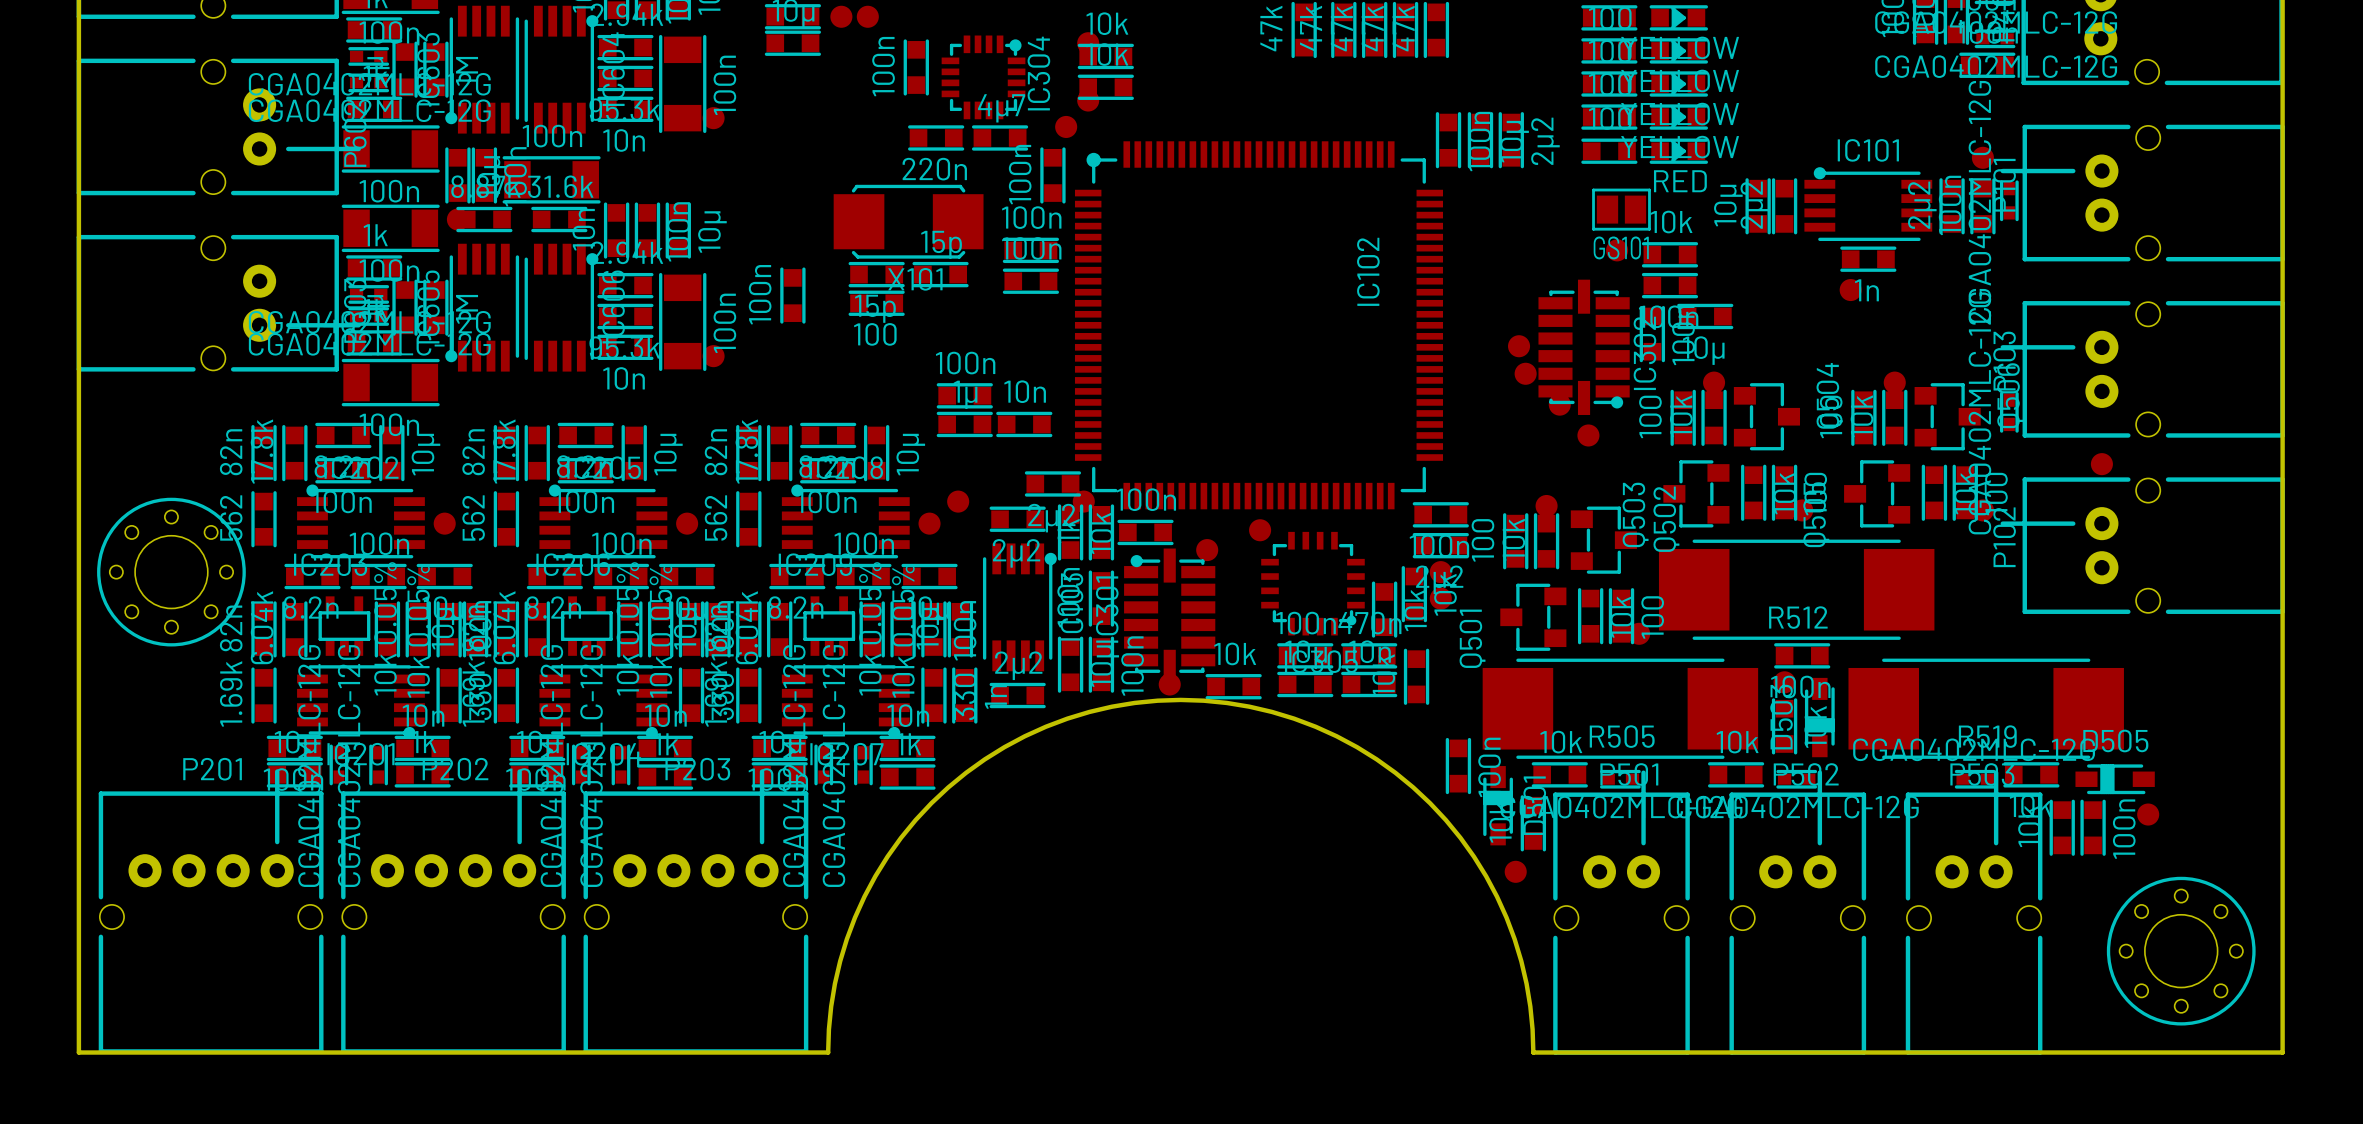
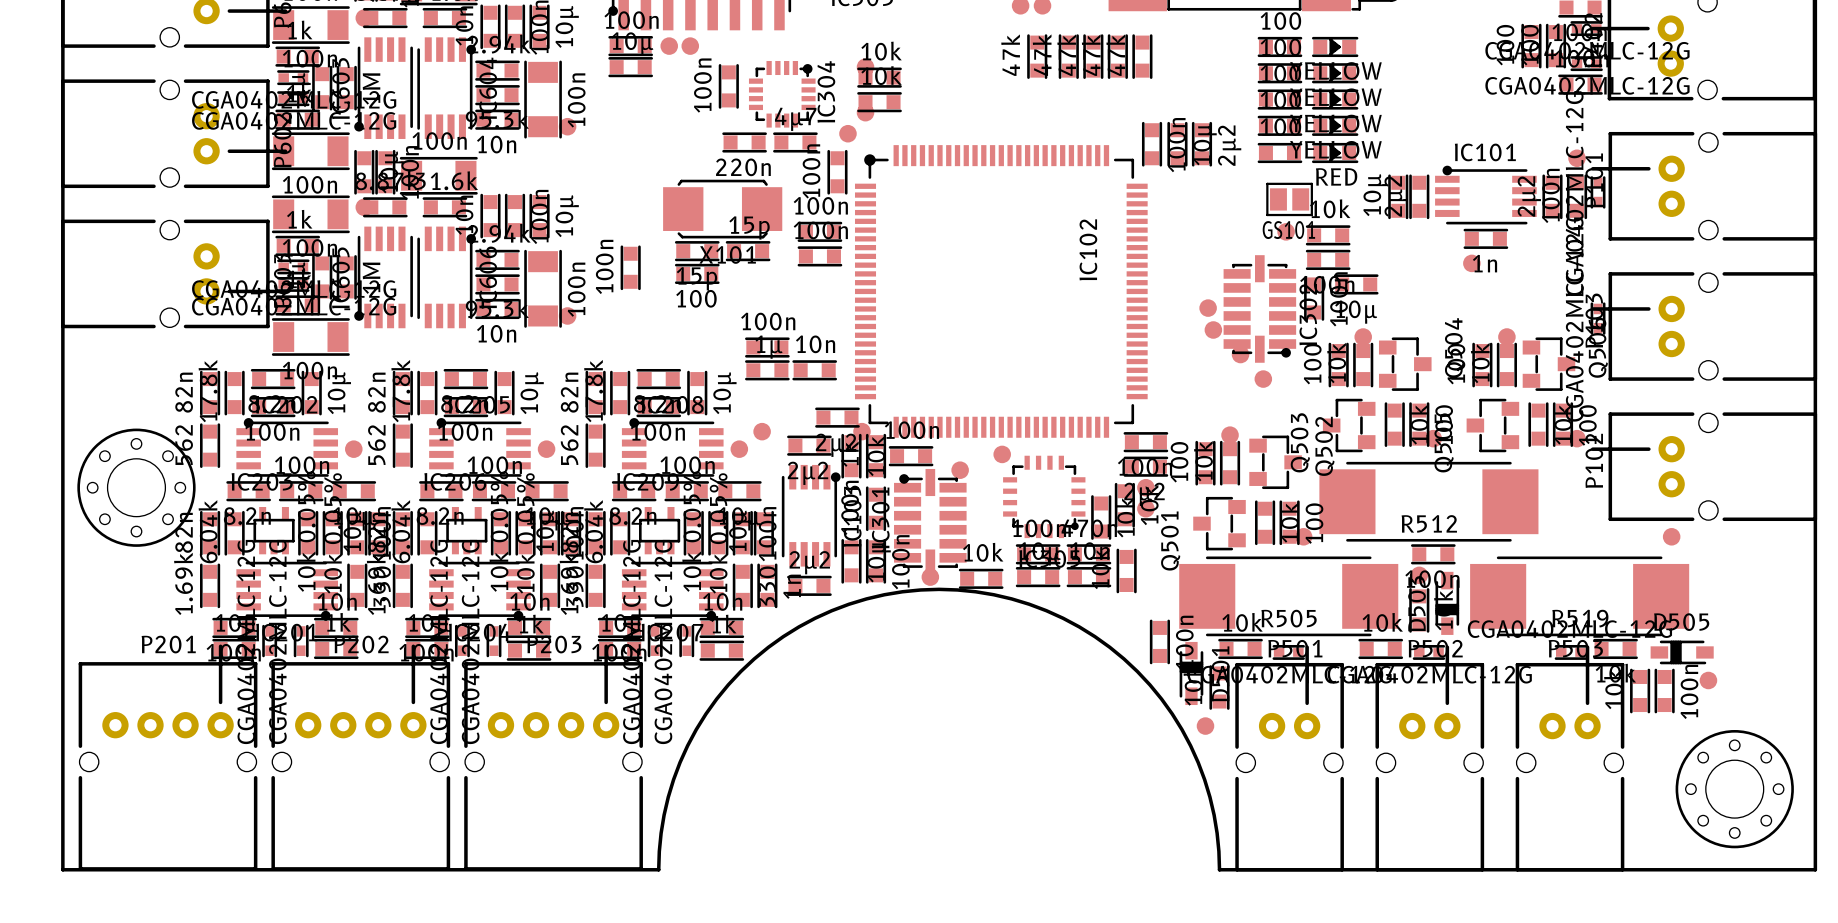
part position: (2009, 412) -> (1598, 318)
part position: (2101, 464) -> (1671, 536)

